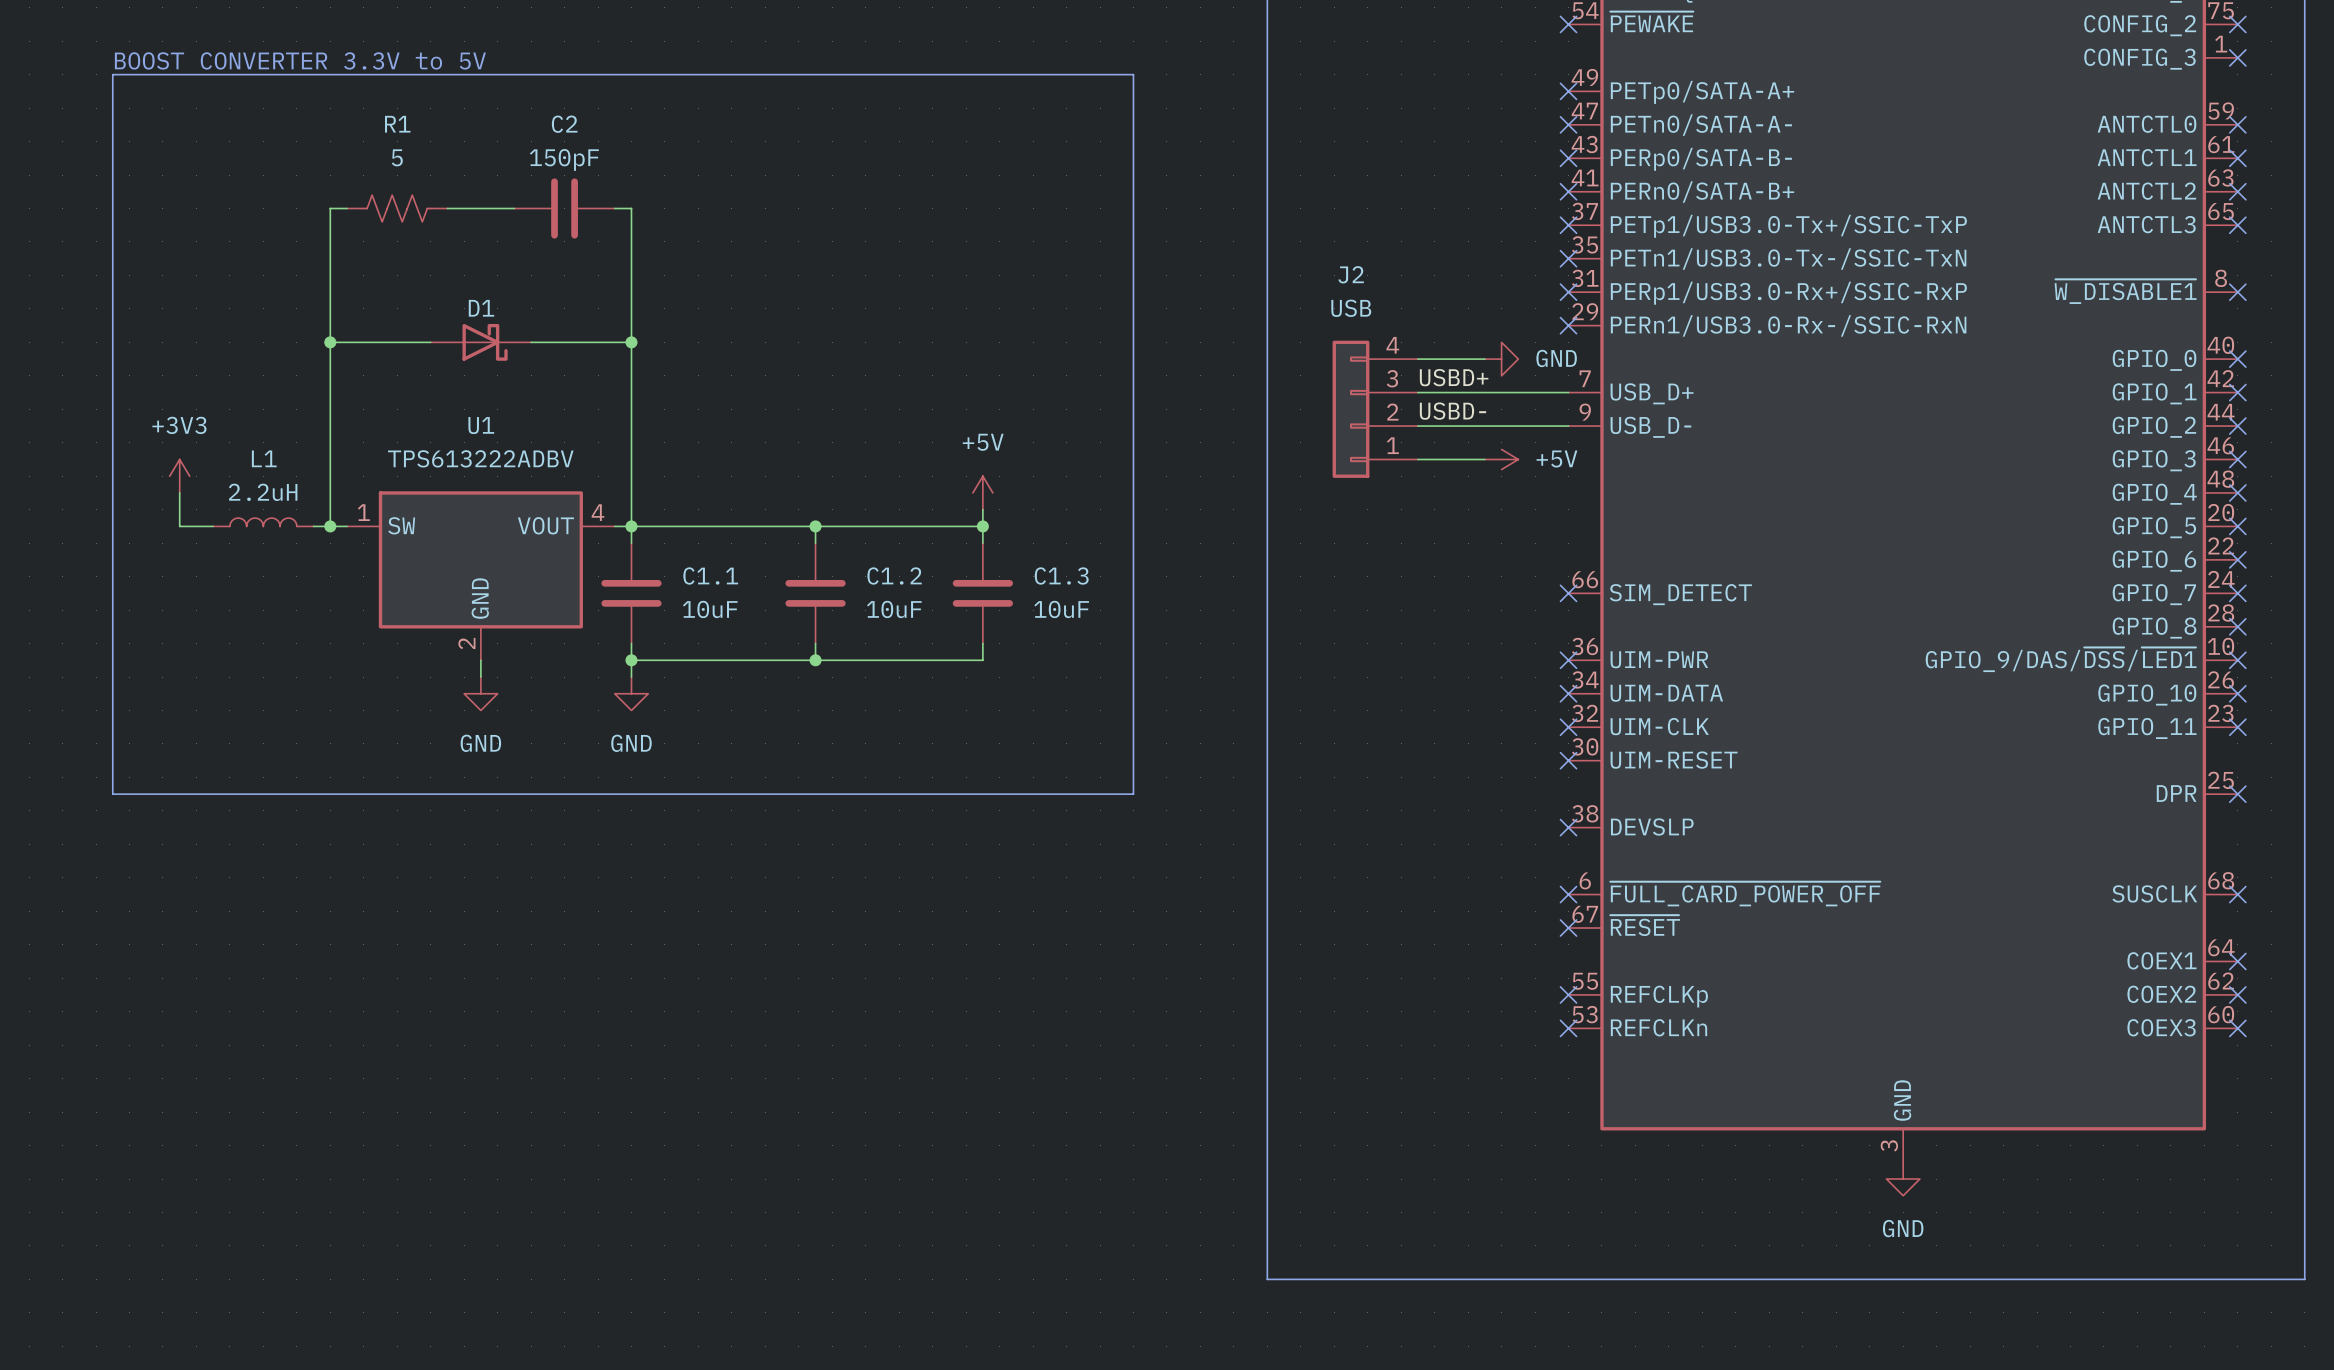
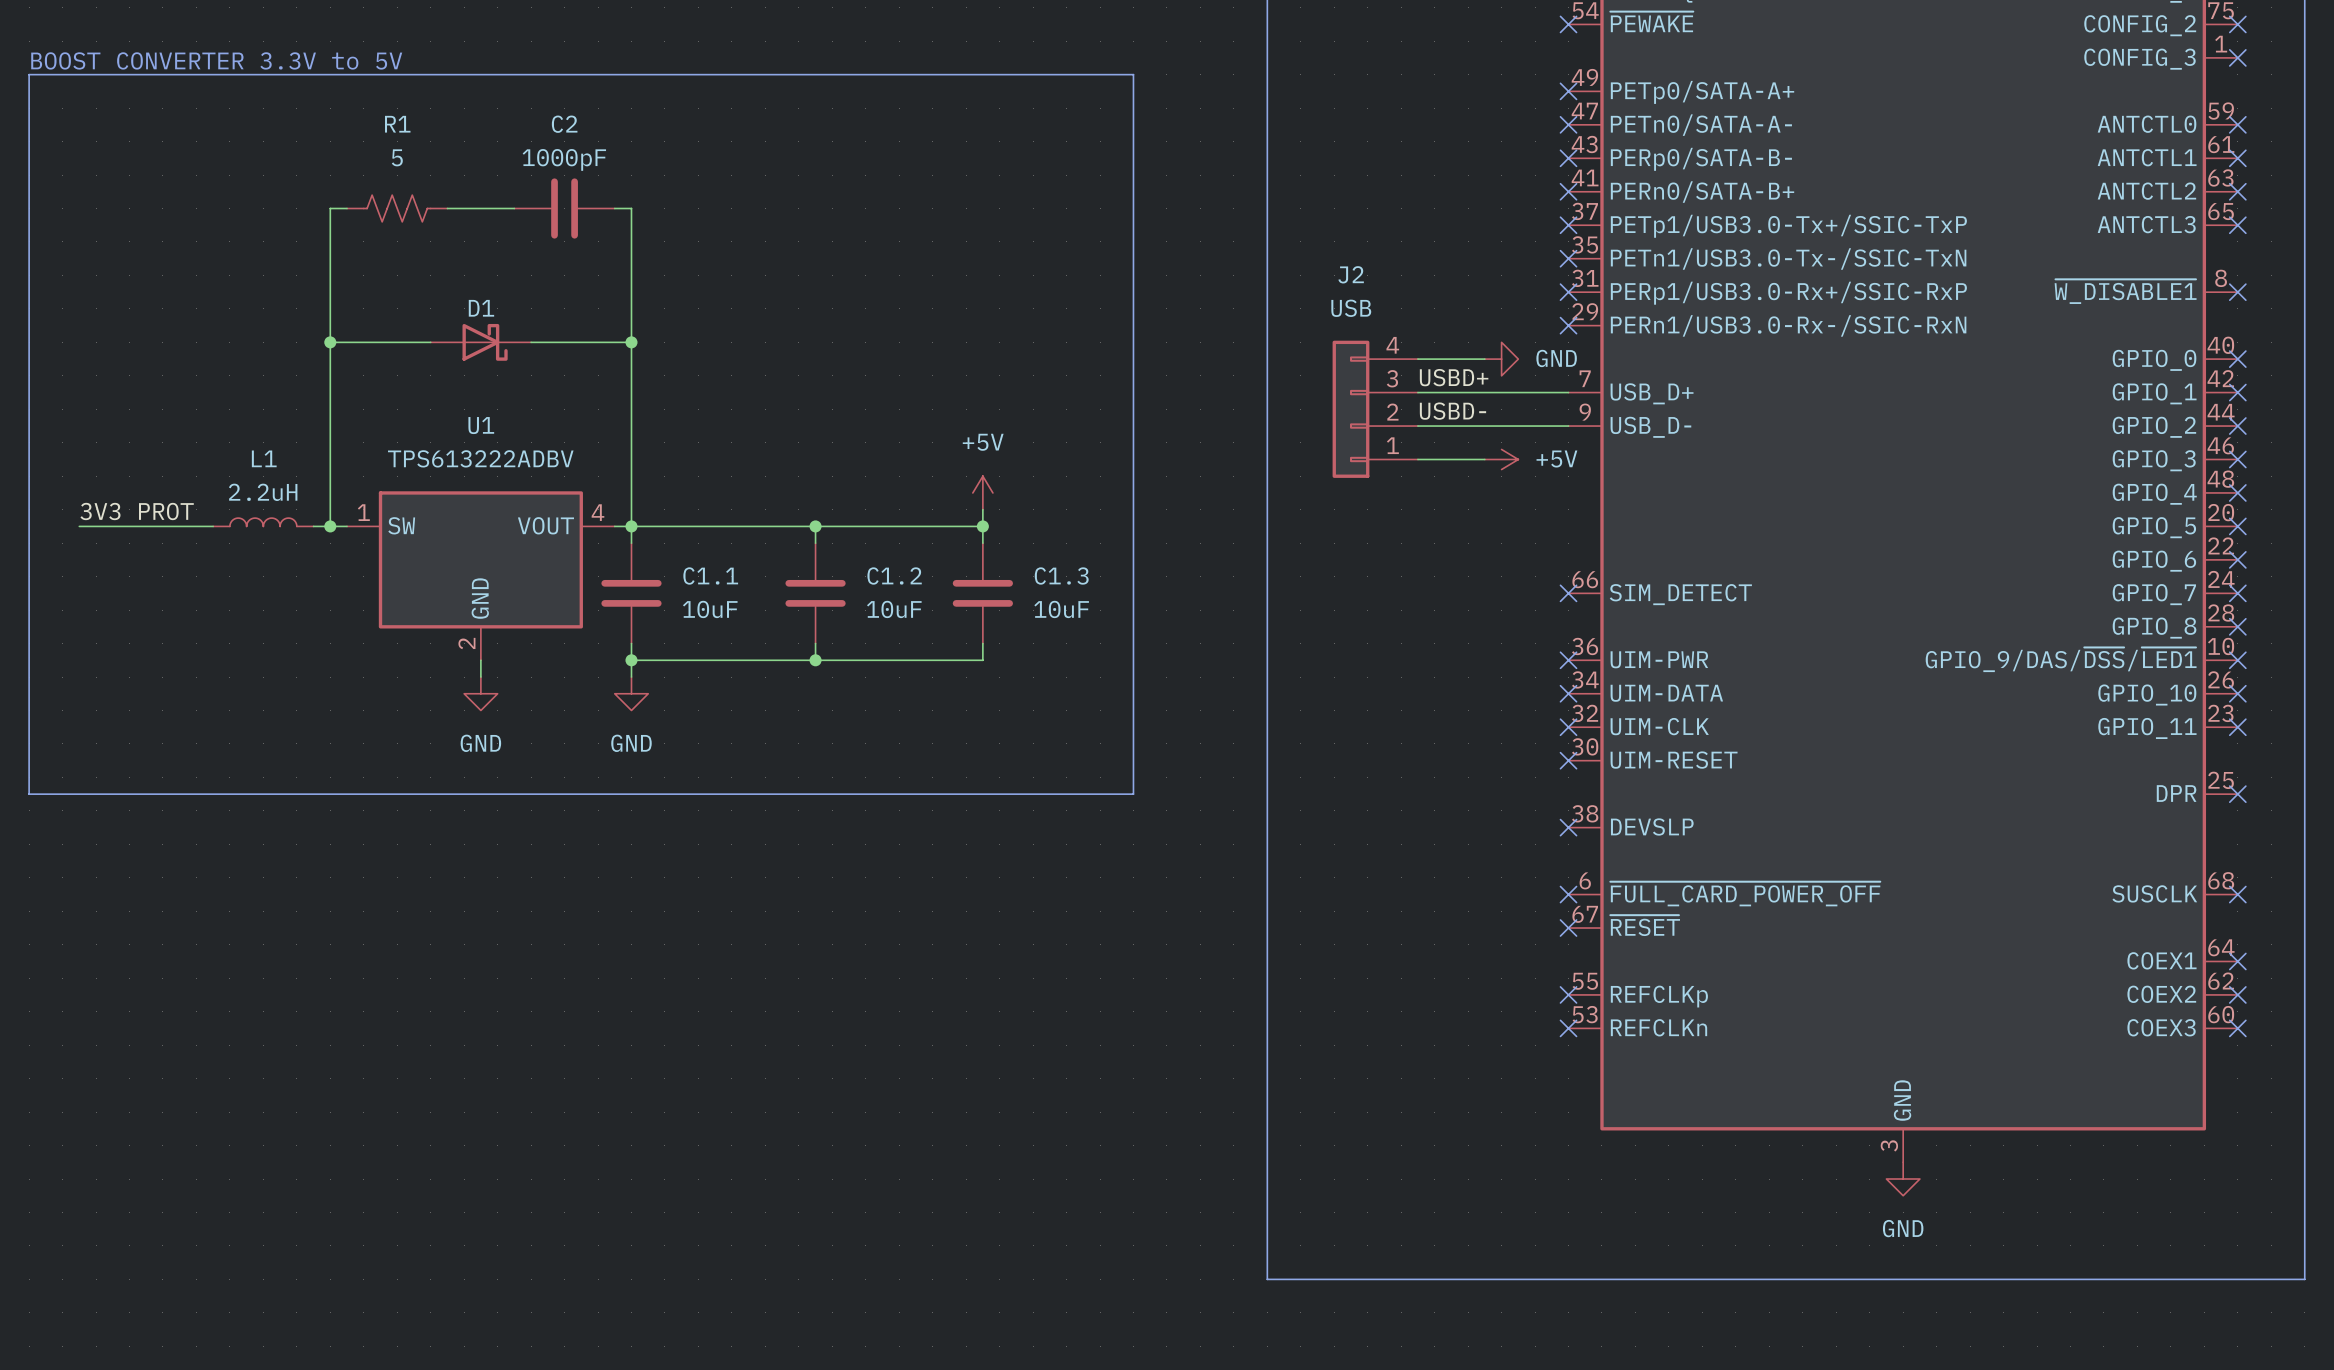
text position: BOOST CONVERTER 3.3V to 5V (300, 60) -> BOOST CONVERTER 3.3V to 5V (216, 60)
line: (112, 74) (112, 794) -> (112, 74) (29, 74) (29, 794) (112, 794)
C2 value: 150pF (564, 159) -> 1000pF (564, 159)
power symbol: +3V3 (179, 476) -> none
wire: (179, 492) (179, 526) -> (79, 526) (179, 526)
label: none -> 3V3 PROT (137, 511)

